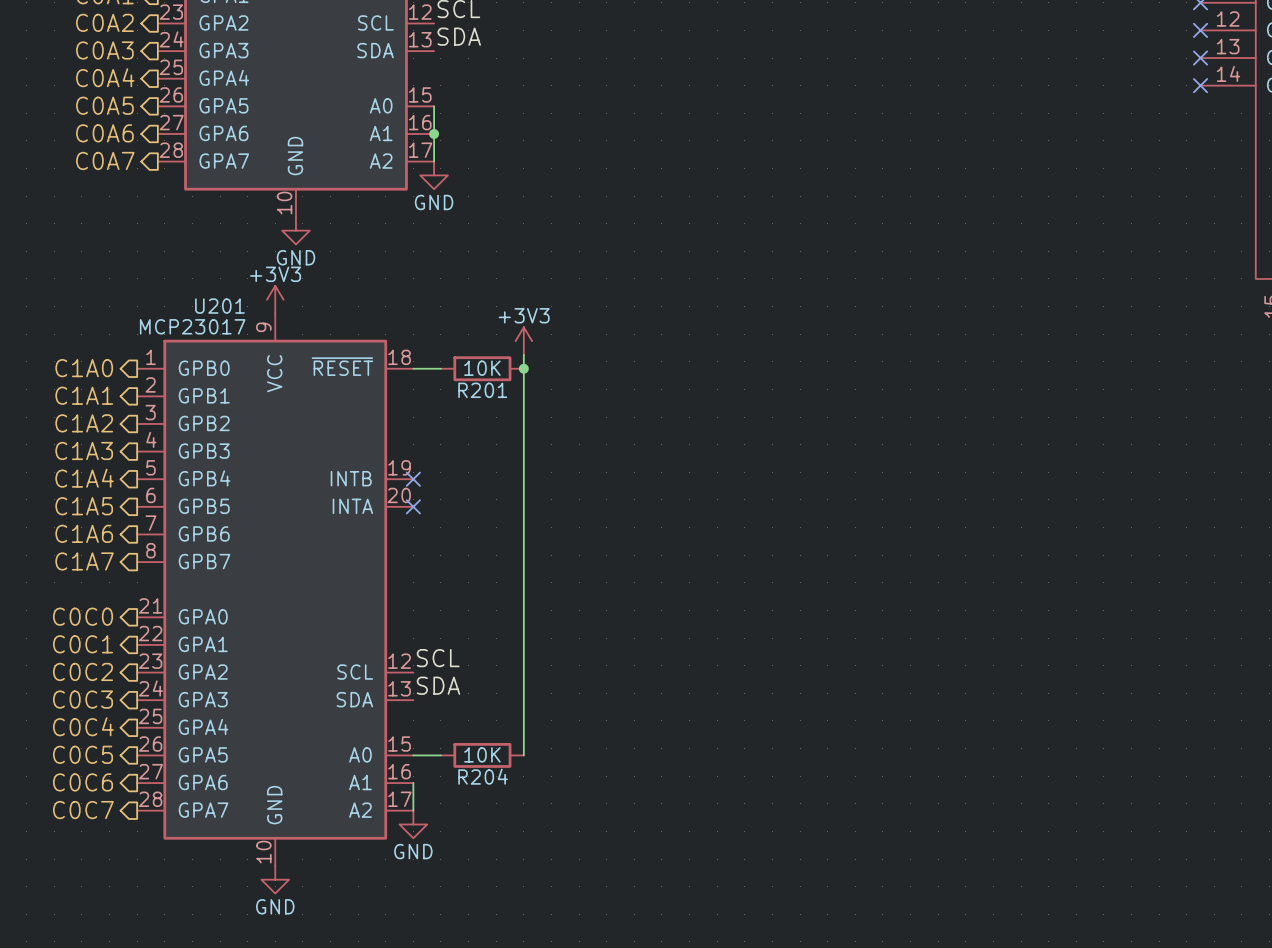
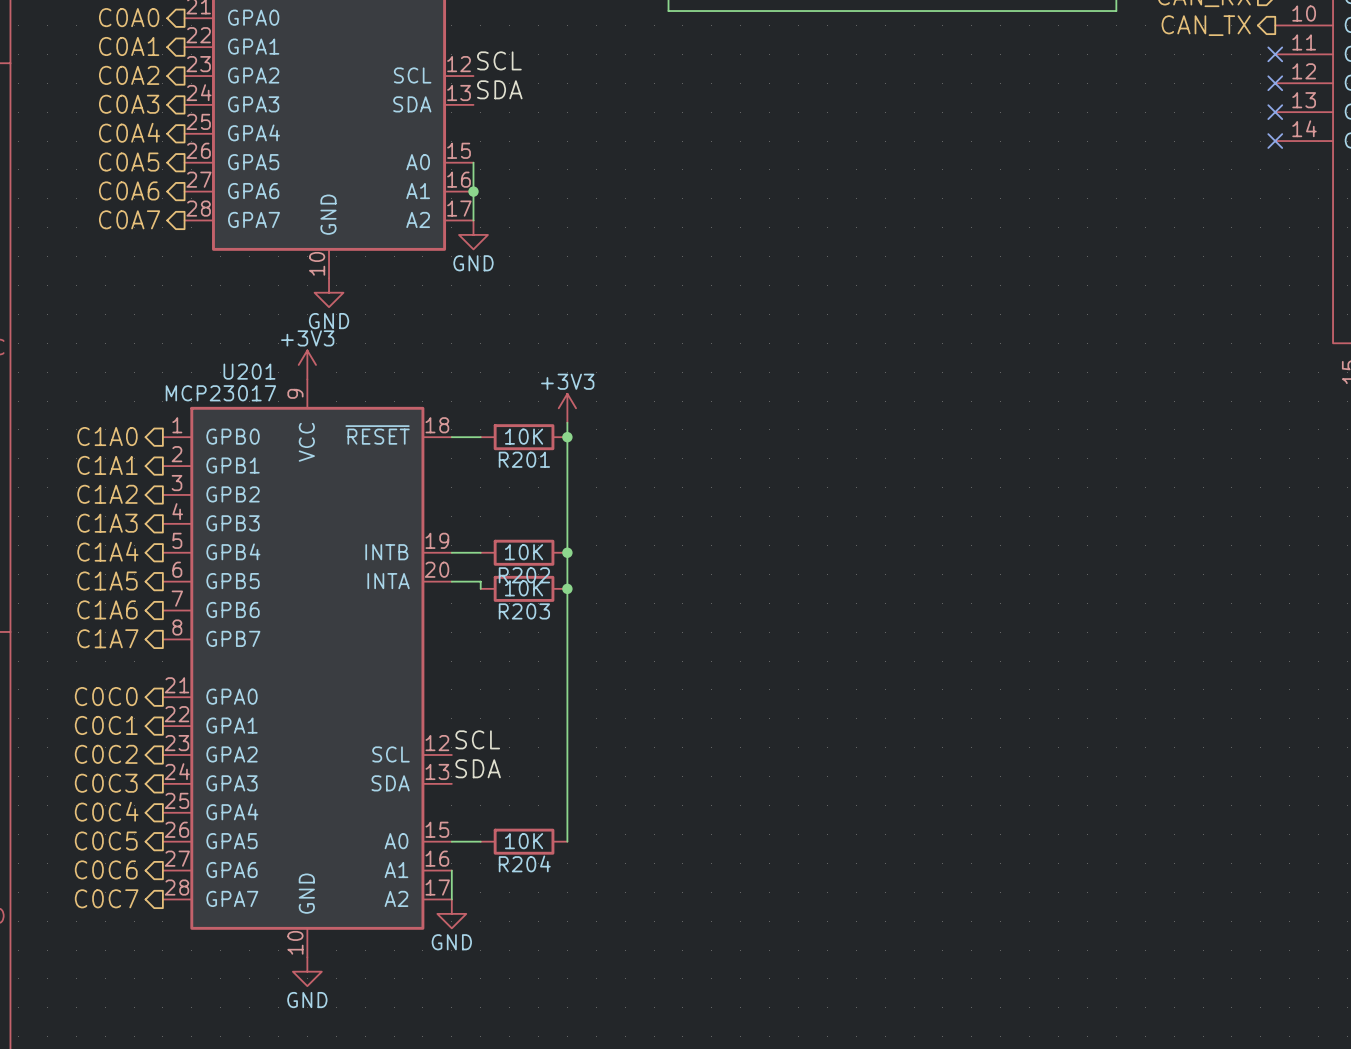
wire: none -> (451, 552) (480, 552)
no-connect mark: (413, 479) -> none
R202: none -> 10K (524, 552)
junction: none -> (567, 552)
wire: none -> (451, 581) (480, 581) (480, 588)
no-connect mark: (413, 506) -> none
R203: none -> 10K (524, 588)
junction: none -> (567, 588)

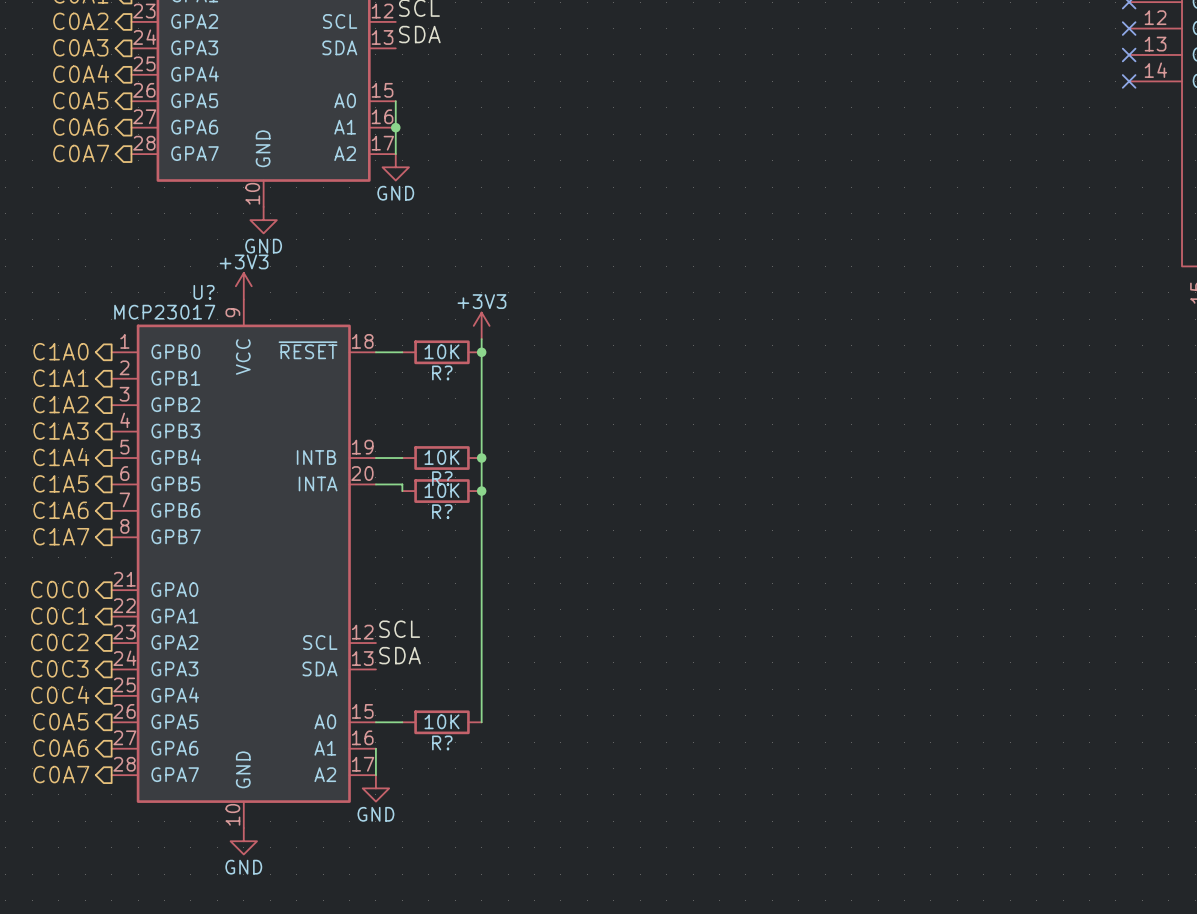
U201 name: U201 (249, 371) -> U? (204, 292)
R201 name: R201 (524, 459) -> R? (442, 372)
R202 name: R202 (524, 575) -> R? (442, 478)
R203 name: R203 (524, 611) -> R? (442, 511)
hierarchical label: C0C5 (106, 841) -> C0A5 (60, 721)
R204 name: R204 (524, 863) -> R? (442, 742)
hierarchical label: C0C6 (106, 869) -> C0A6 (60, 748)
hierarchical label: C0C7 (106, 898) -> C0A7 (61, 774)

